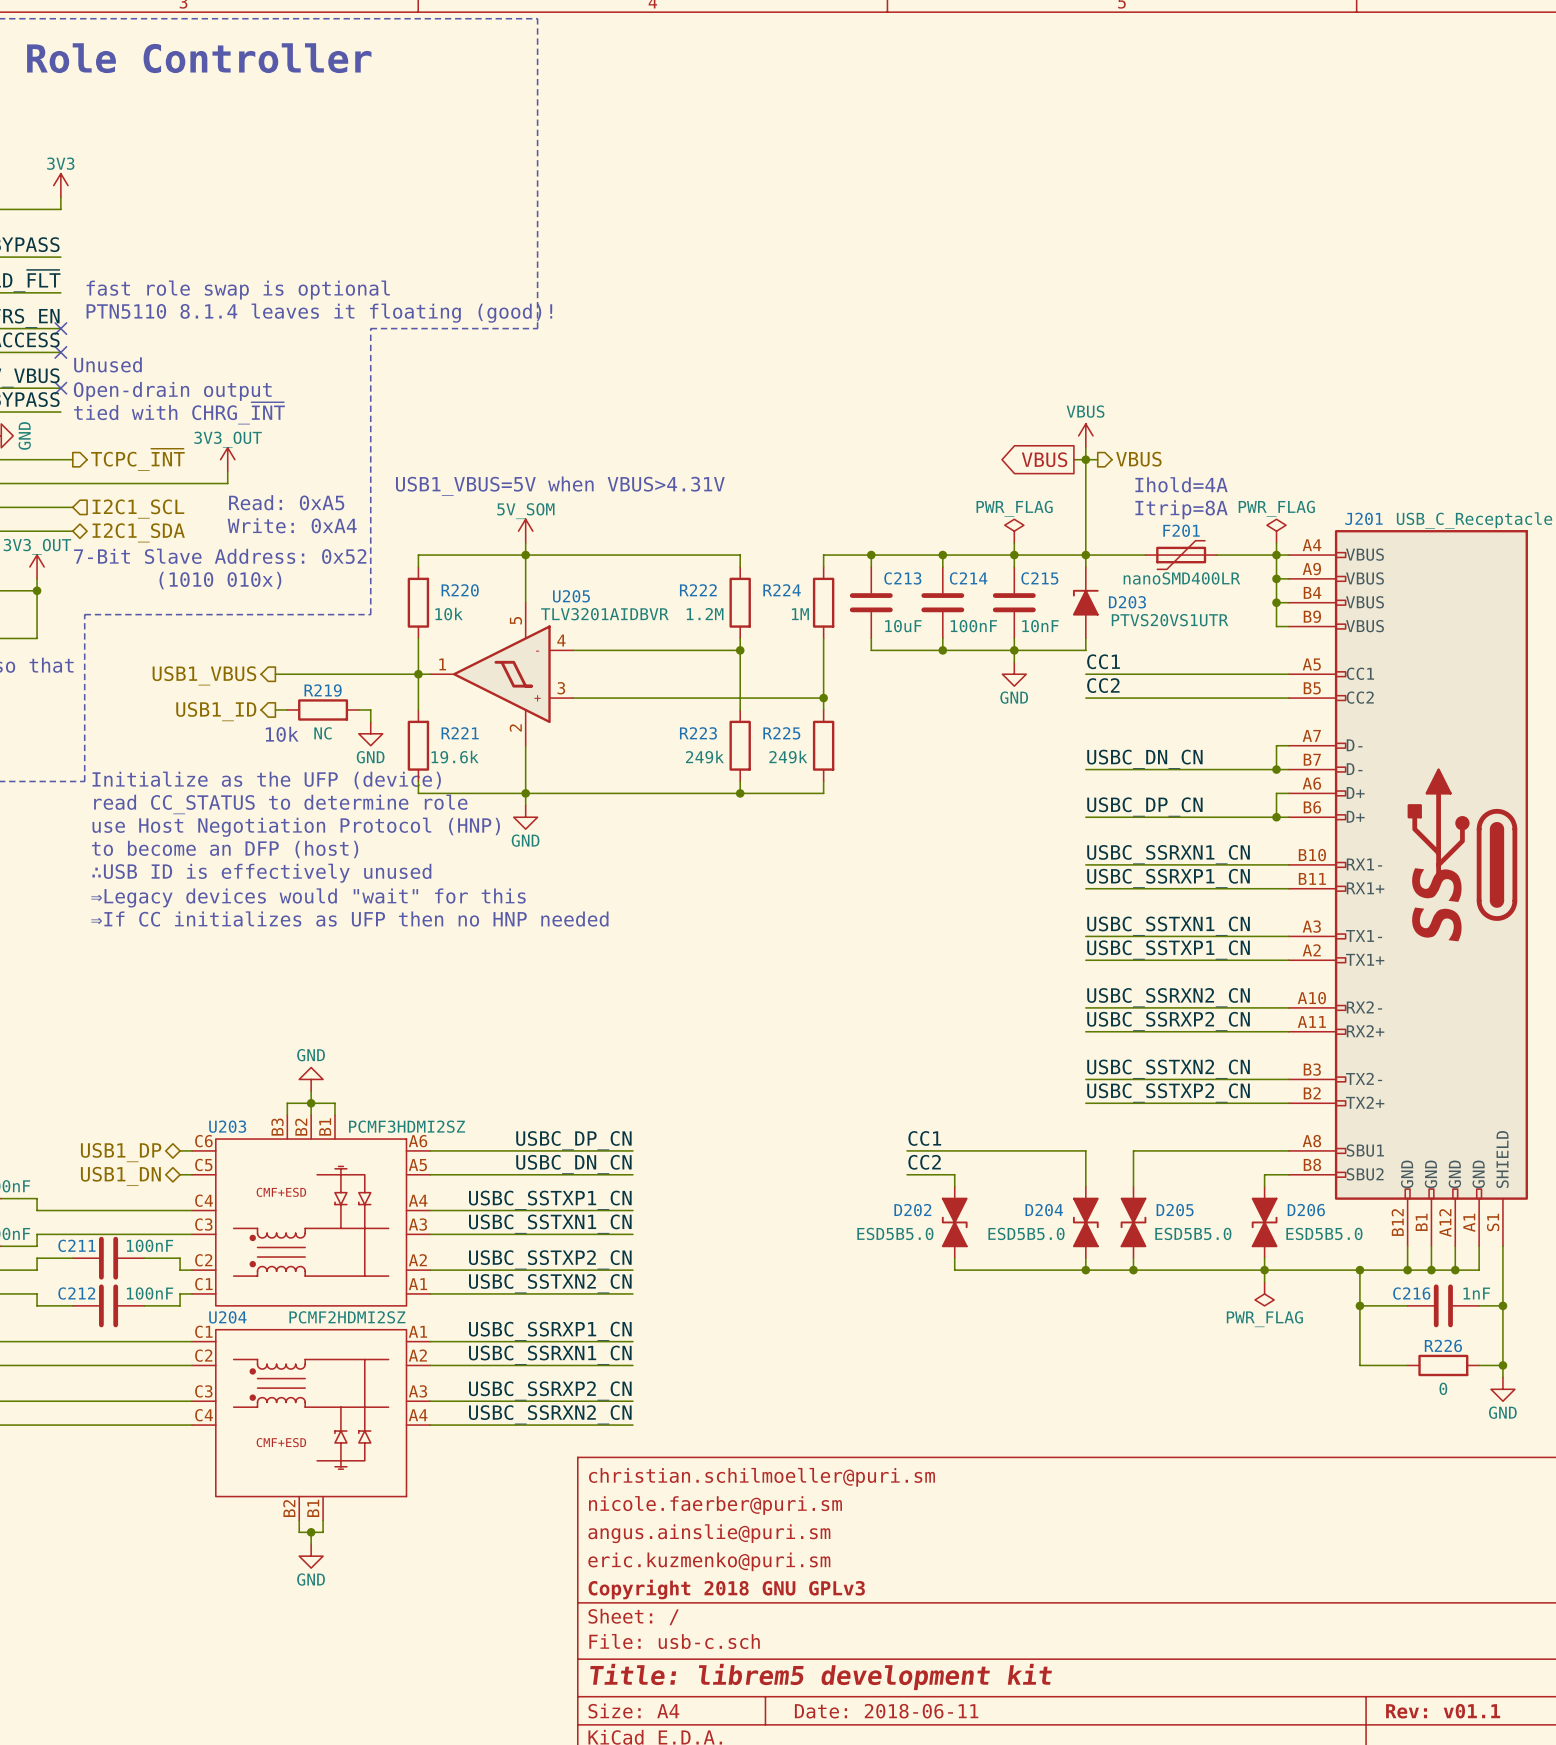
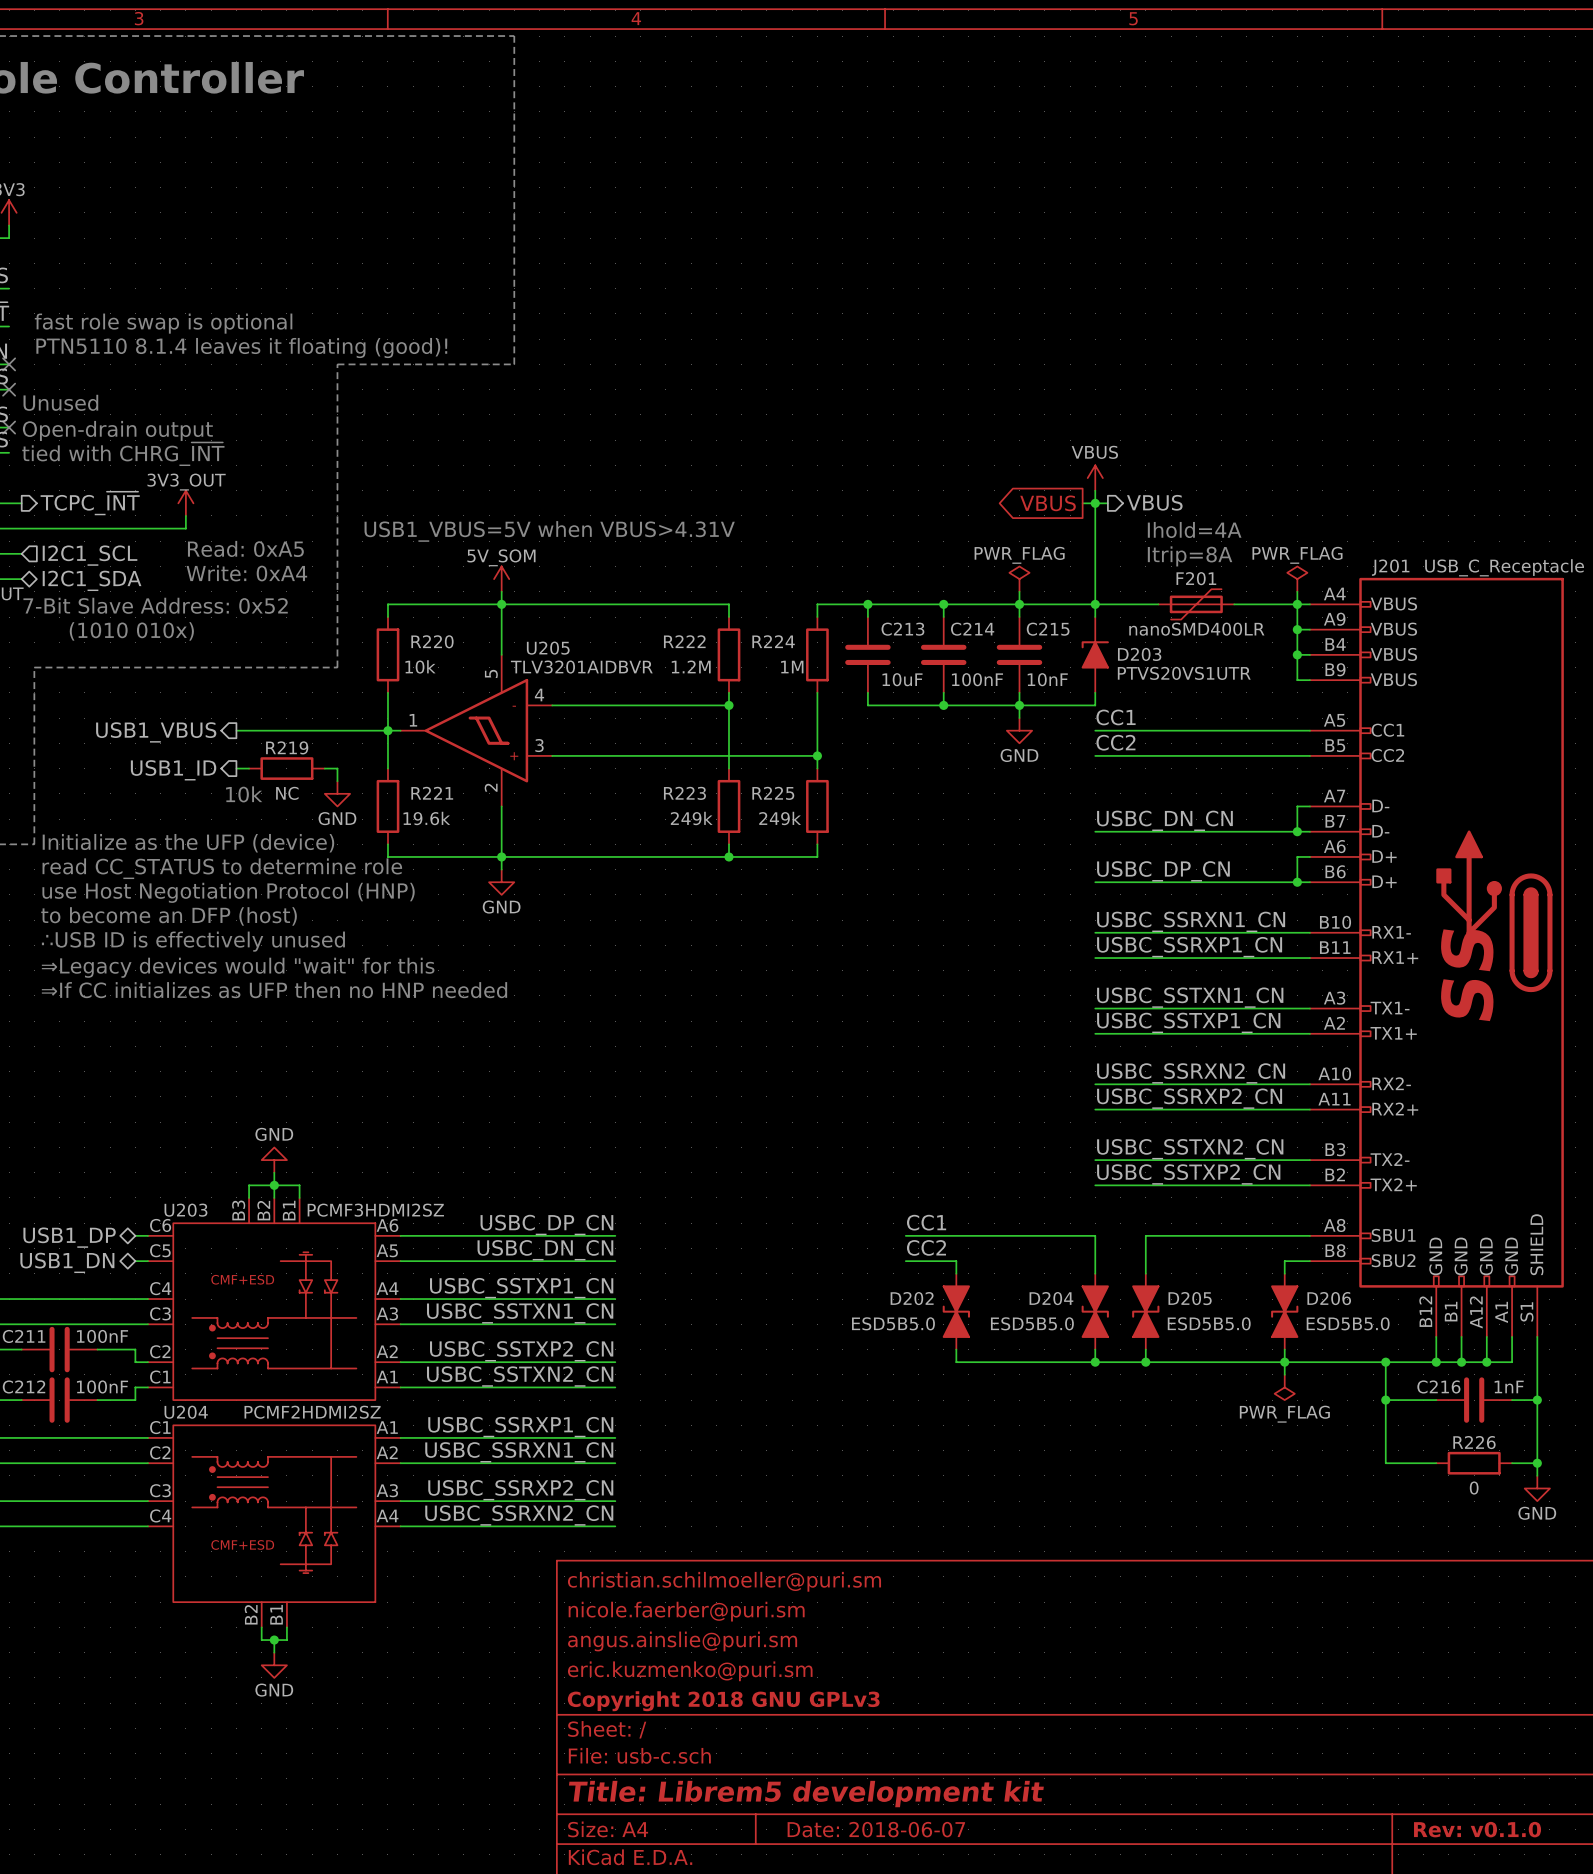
title block: Title: librem5 development kit (821, 1676) -> Title: Librem5 development kit (806, 1794)
title block: Date: 2018-06-11 (886, 1711) -> Date: 2018-06-07 (876, 1829)
title block: Rev: v01.1 (1443, 1711) -> Rev: v0.1.0 (1477, 1829)

